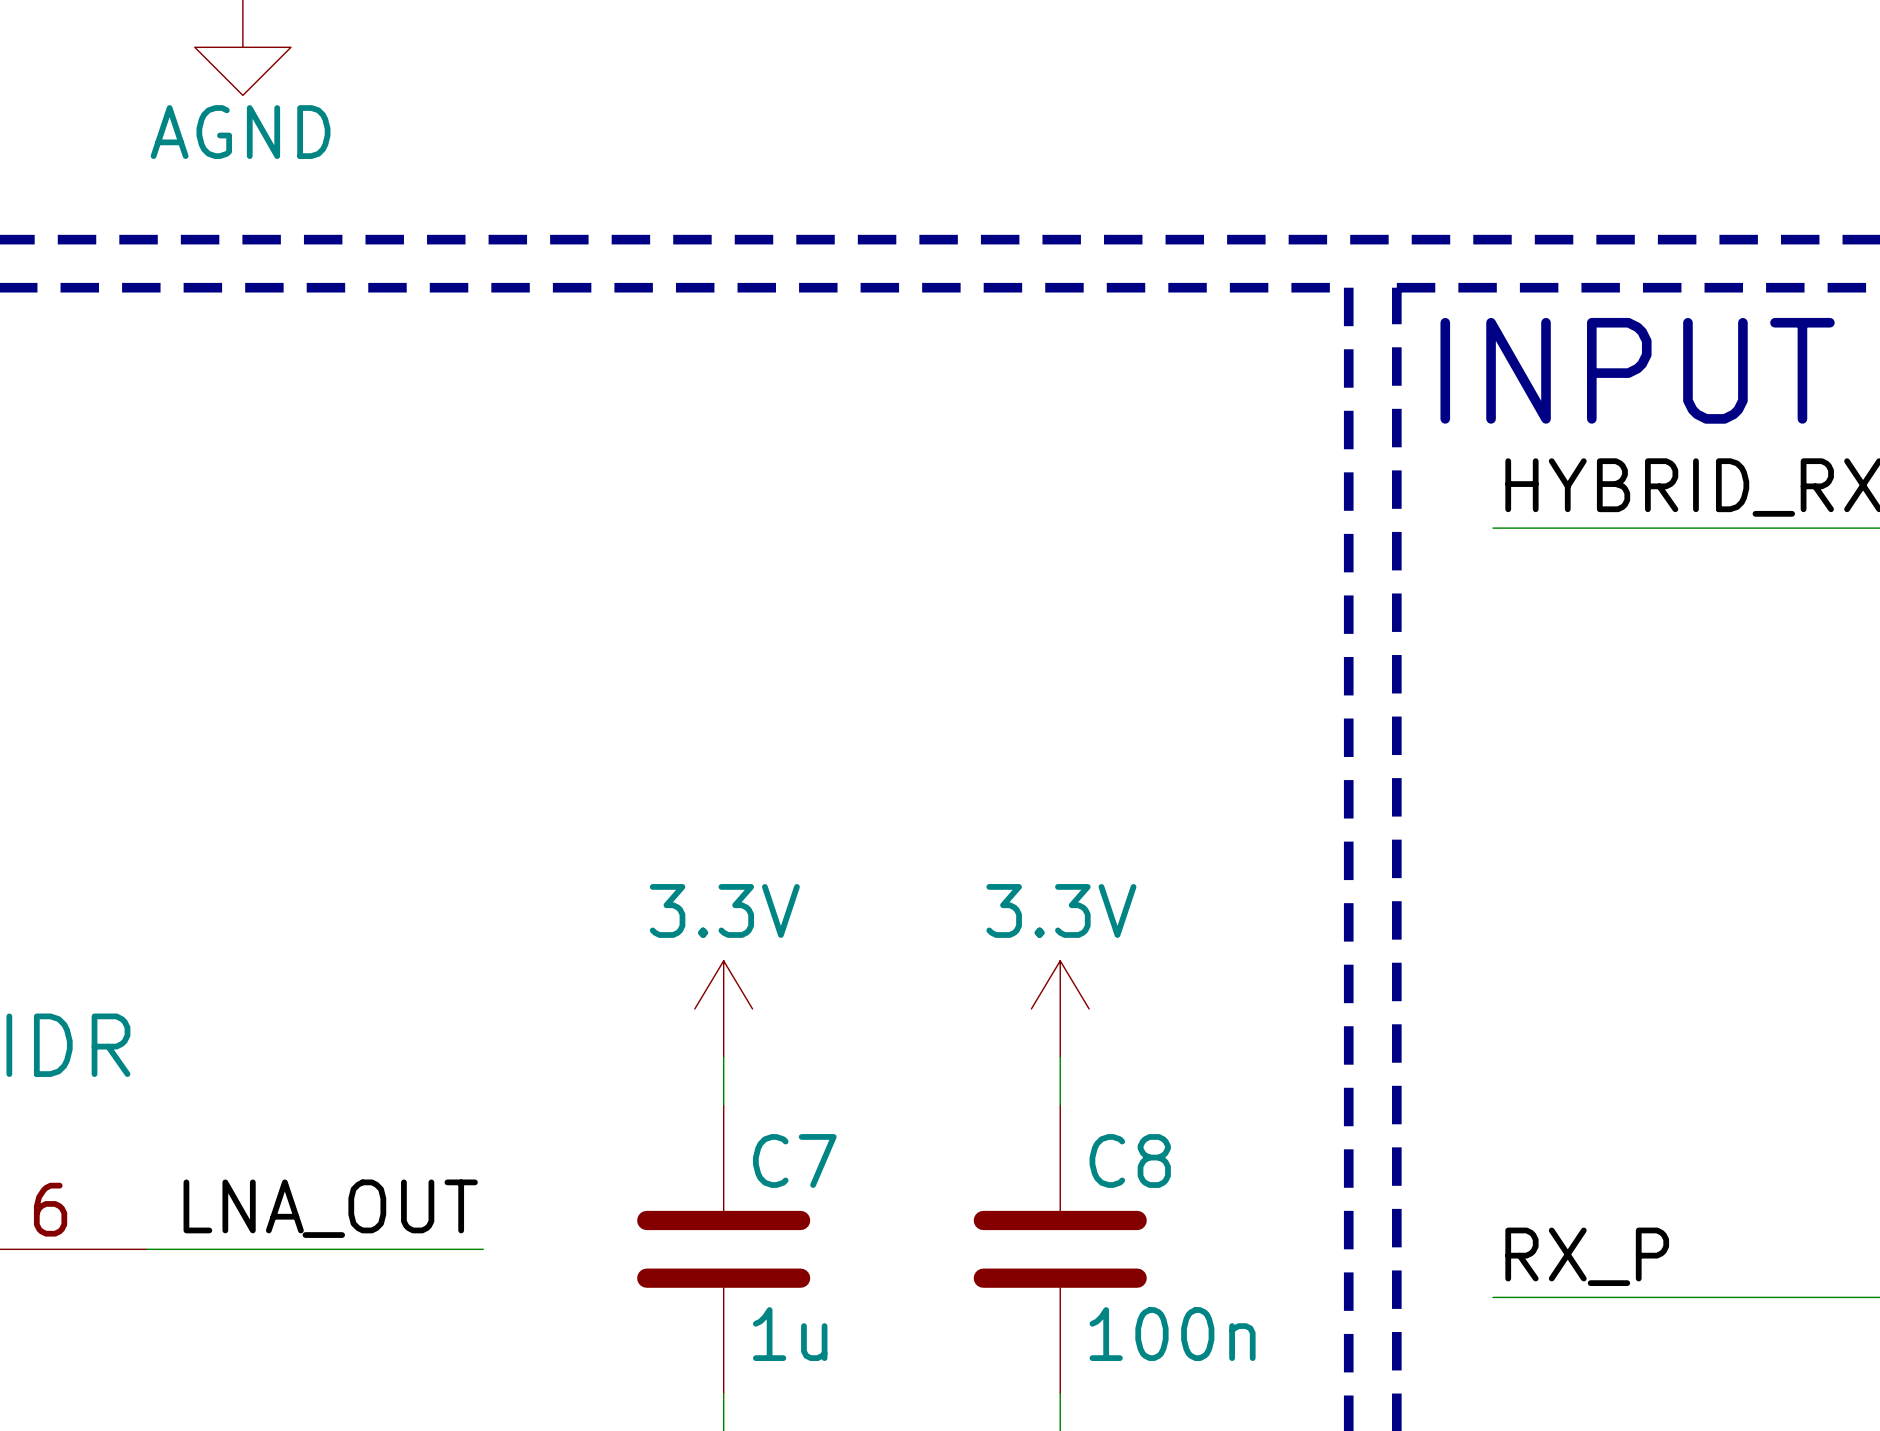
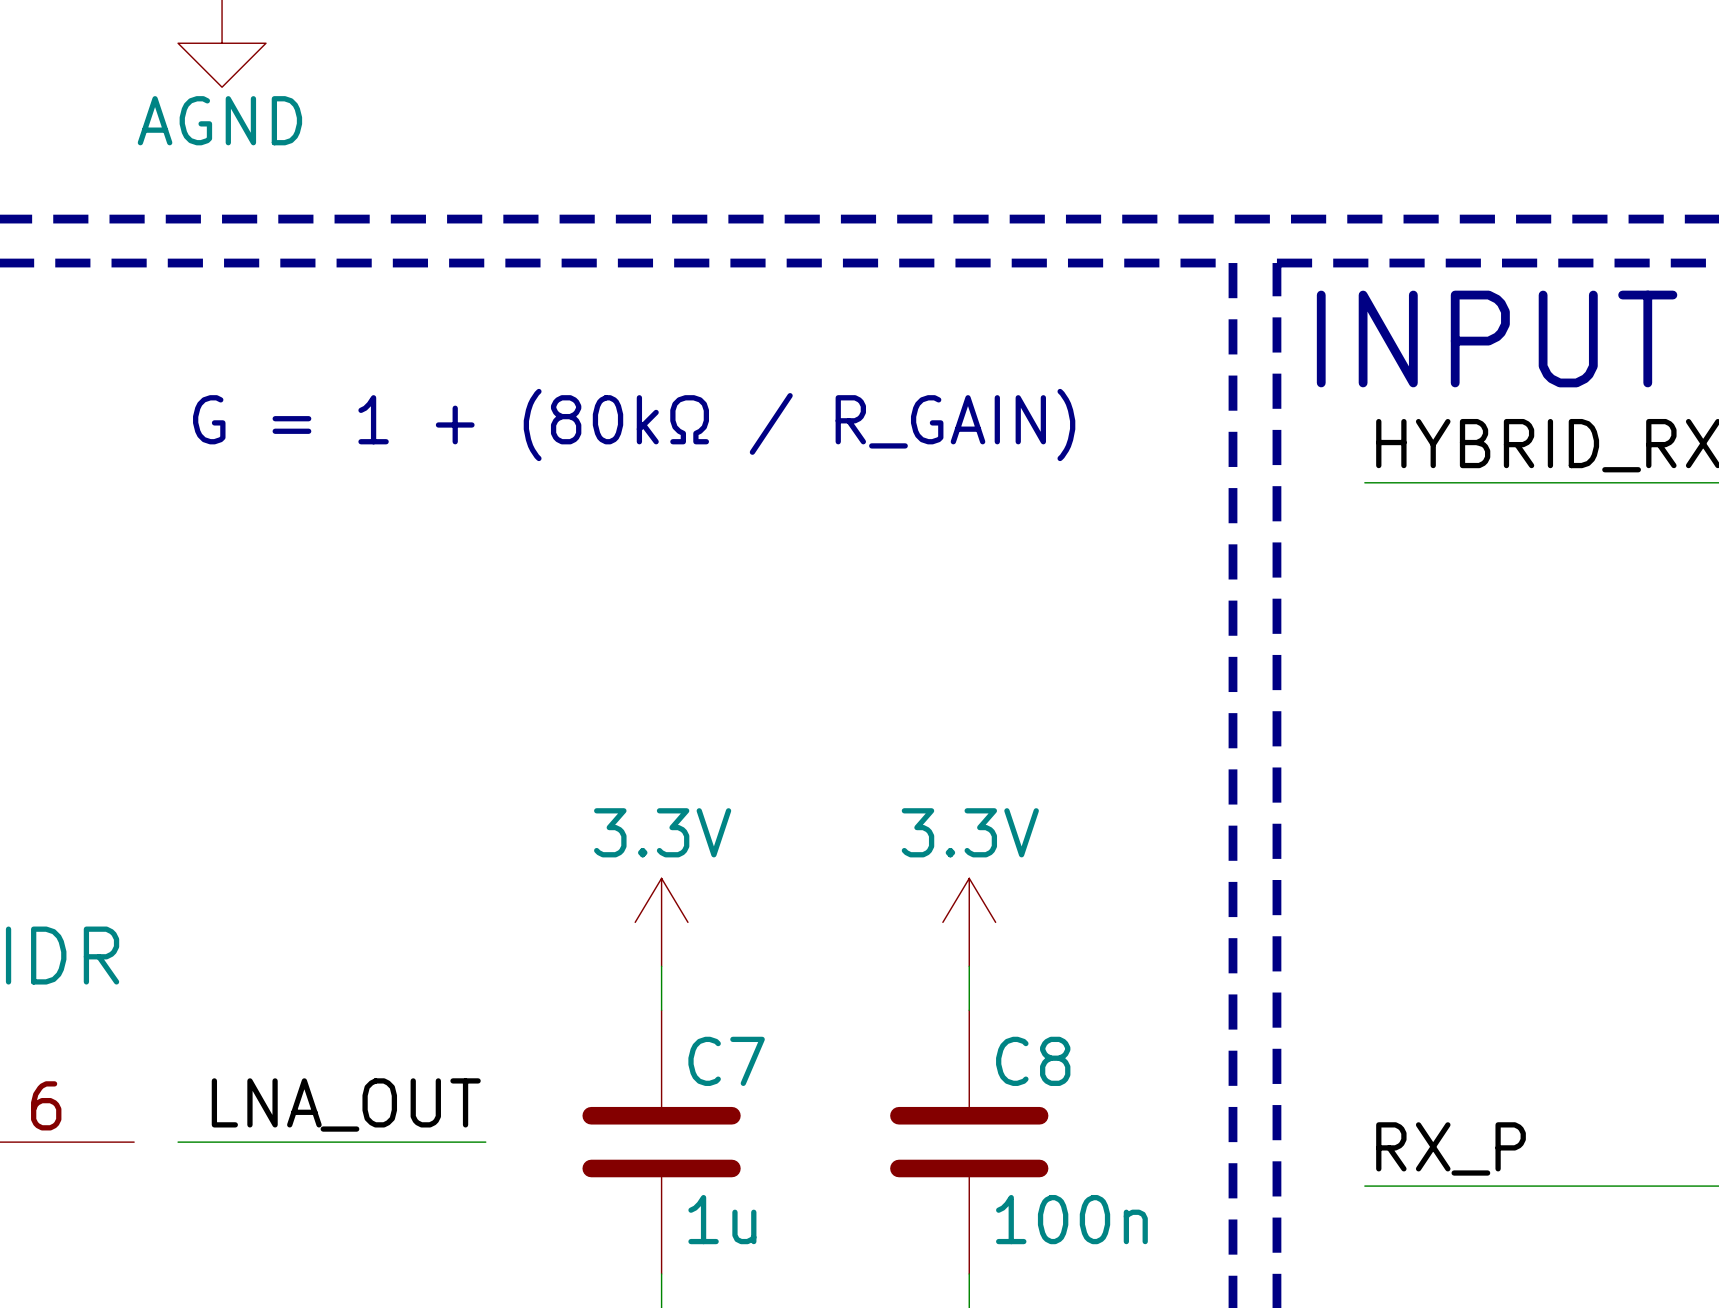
text: none -> G = 1 + (80kΩ / R_GAIN) (634, 424)
label position: LNA_OUT (330, 1208) -> LNA_OUT (346, 1104)
wire: (146, 1249) (194, 1249) -> (441, 1142) (485, 1142)

